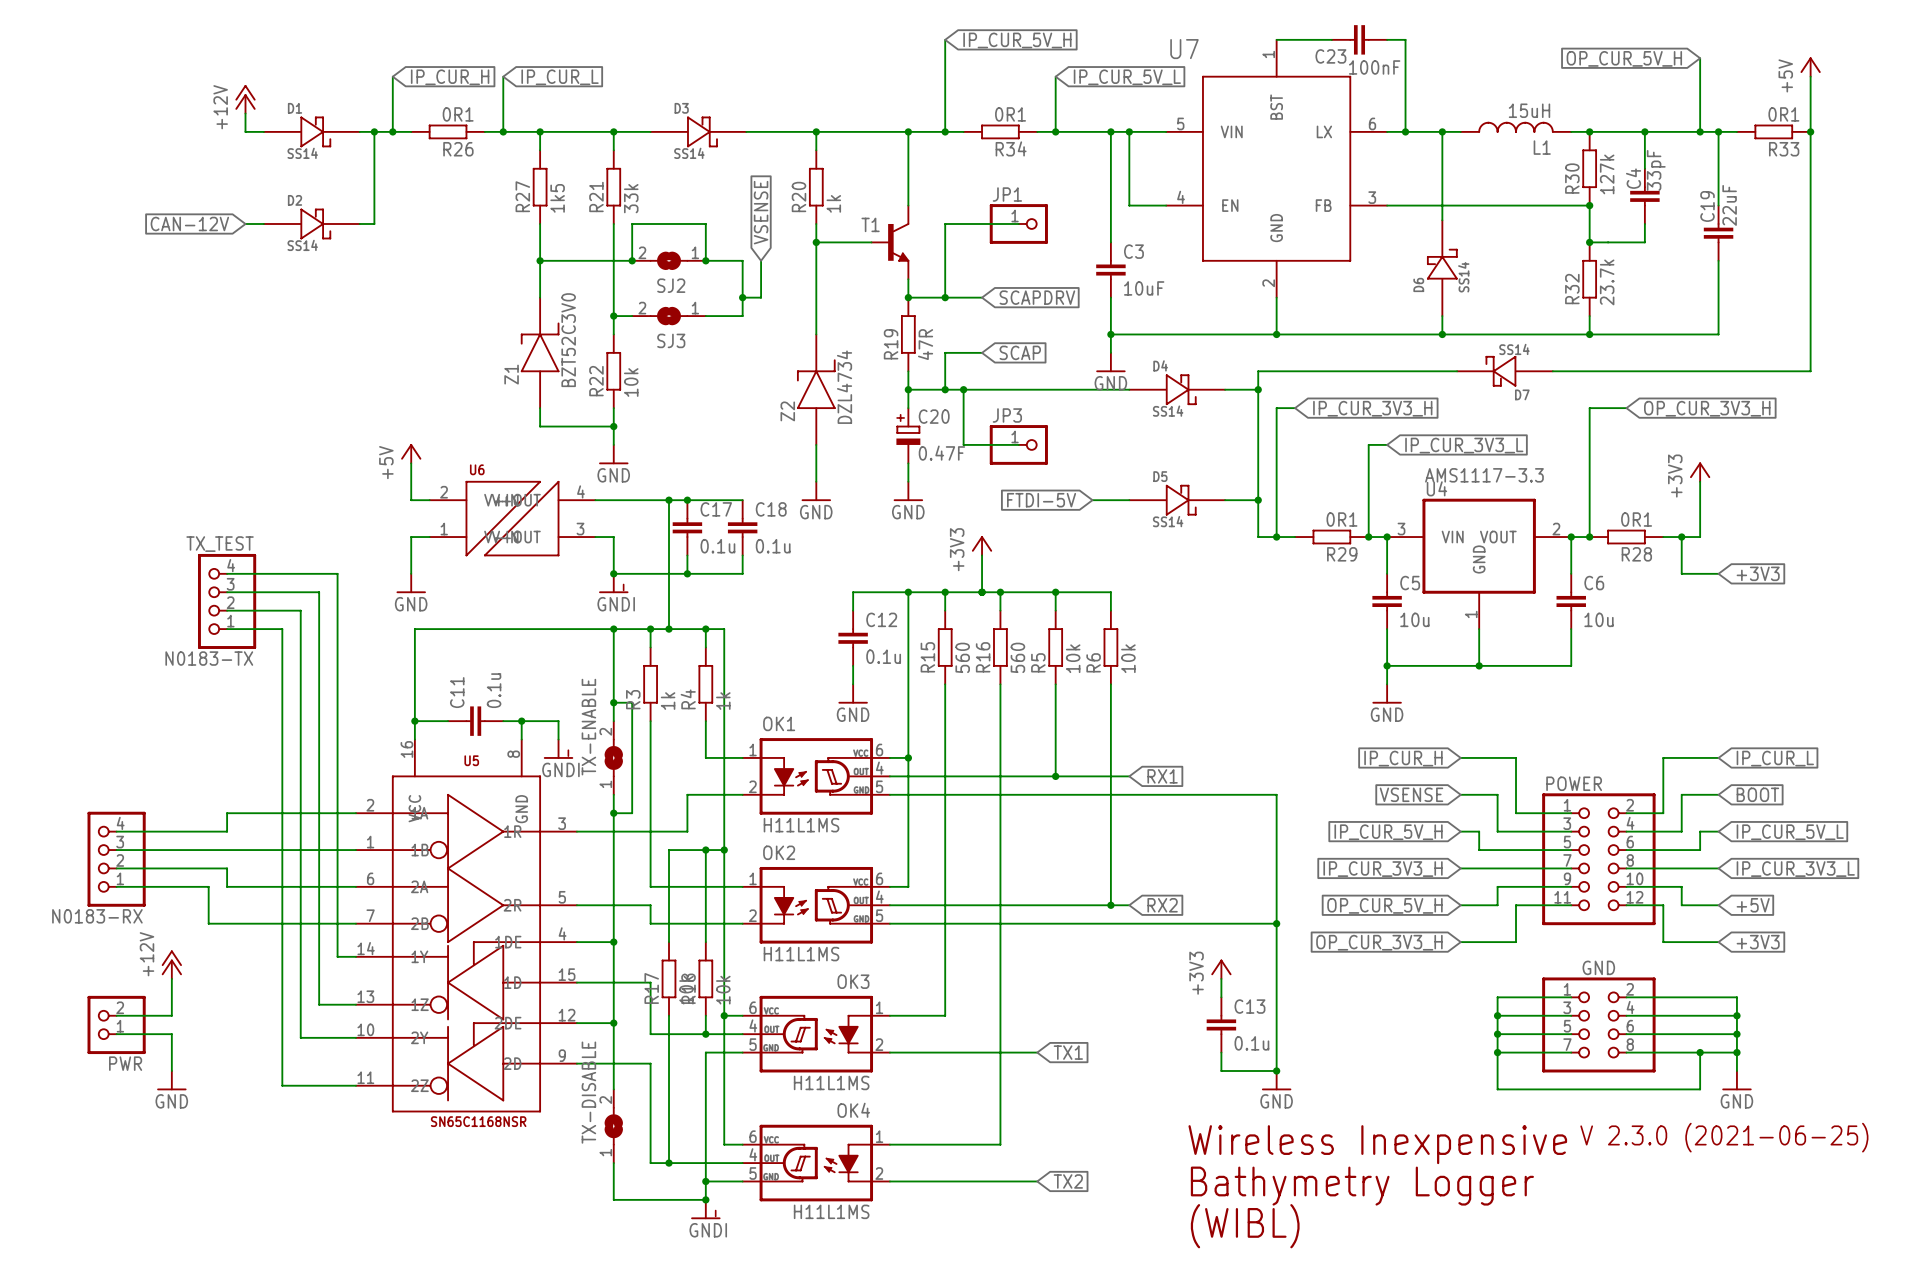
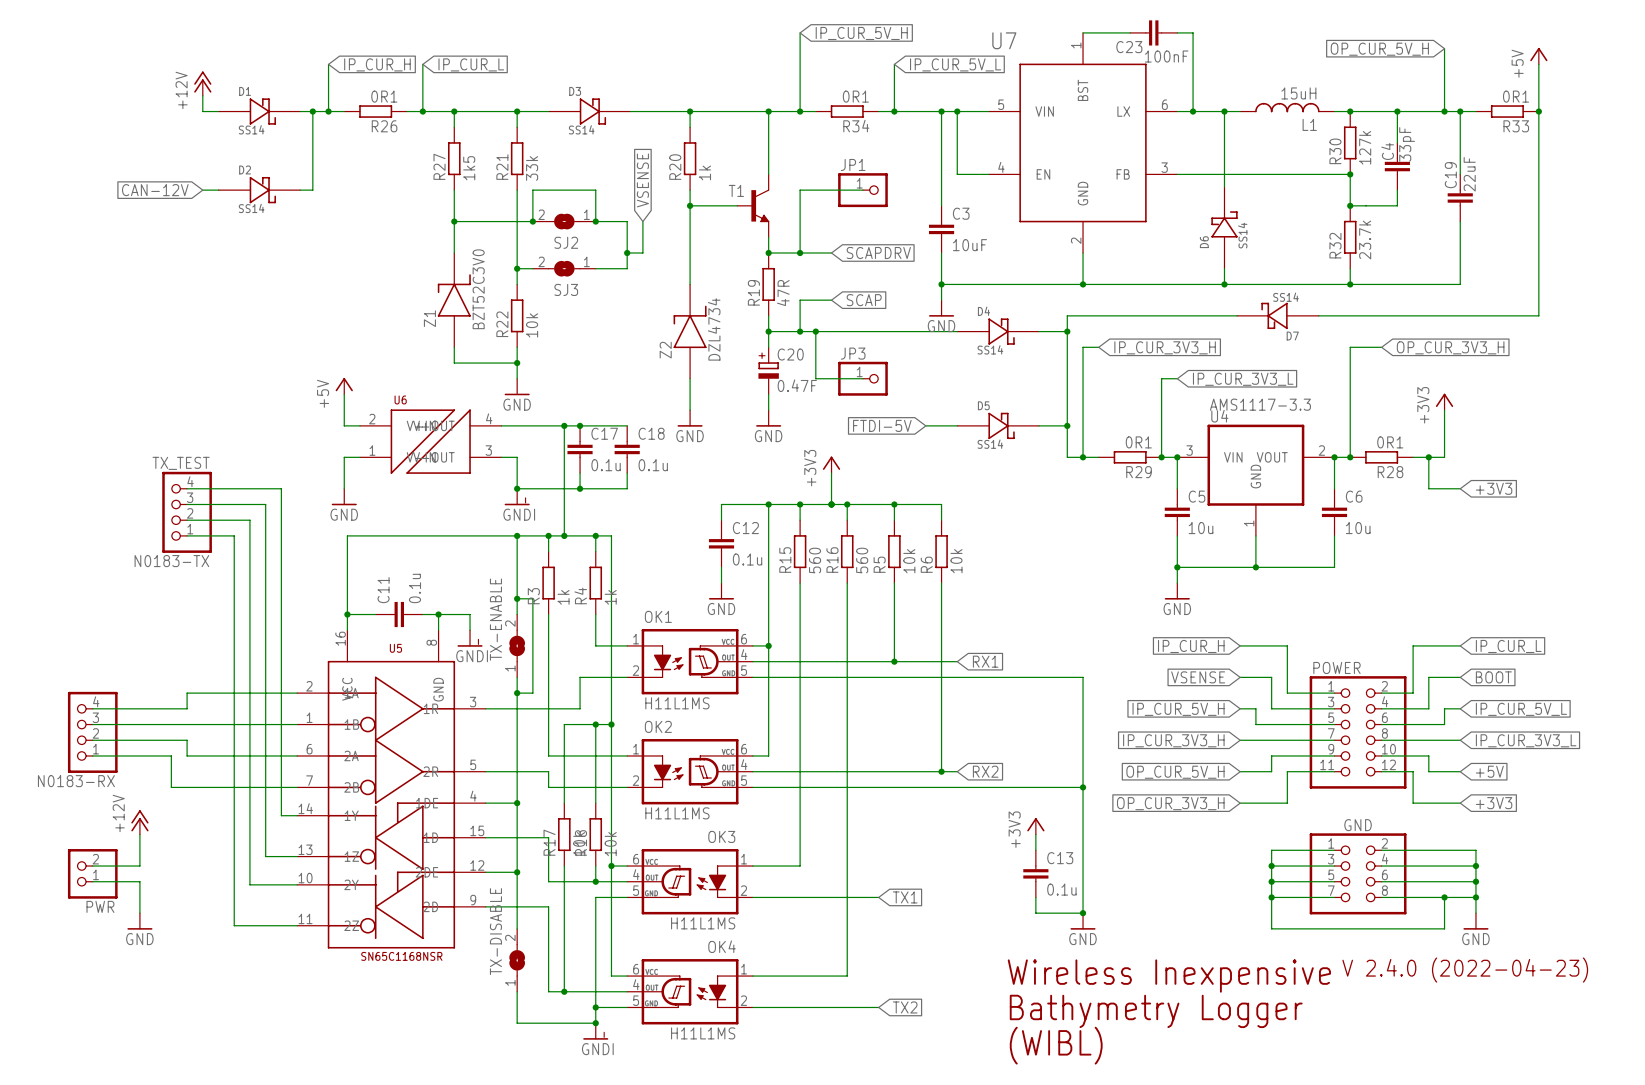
text: V 2.3.0 (2021-06-25) (1724, 1137) -> V 2.4.0 (2022-04-23) (1465, 970)

